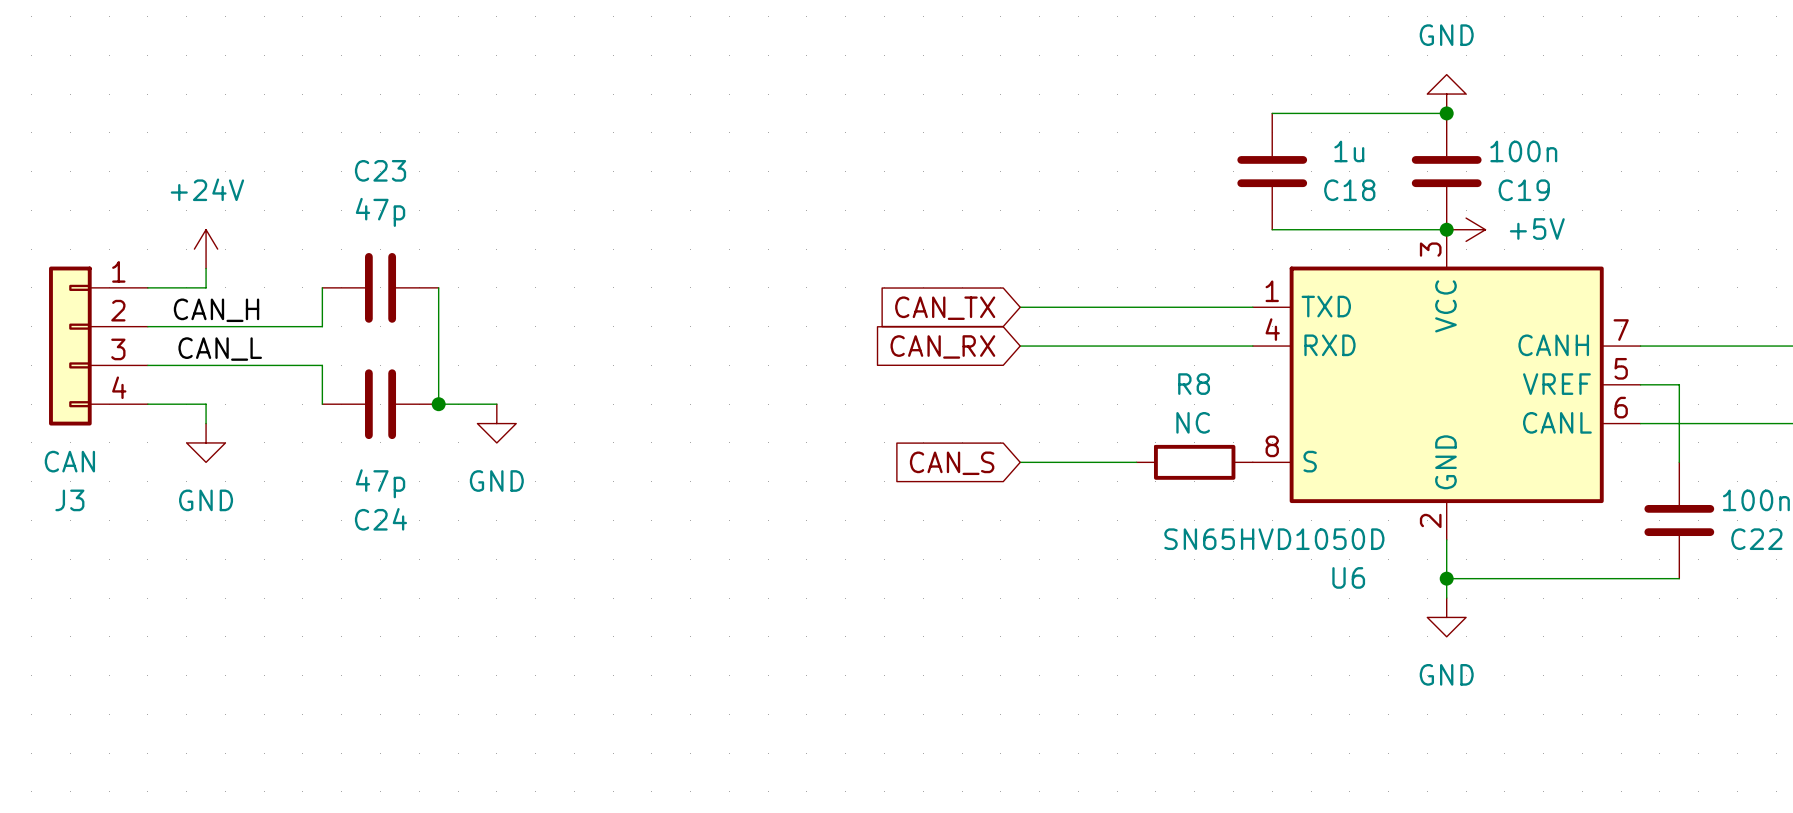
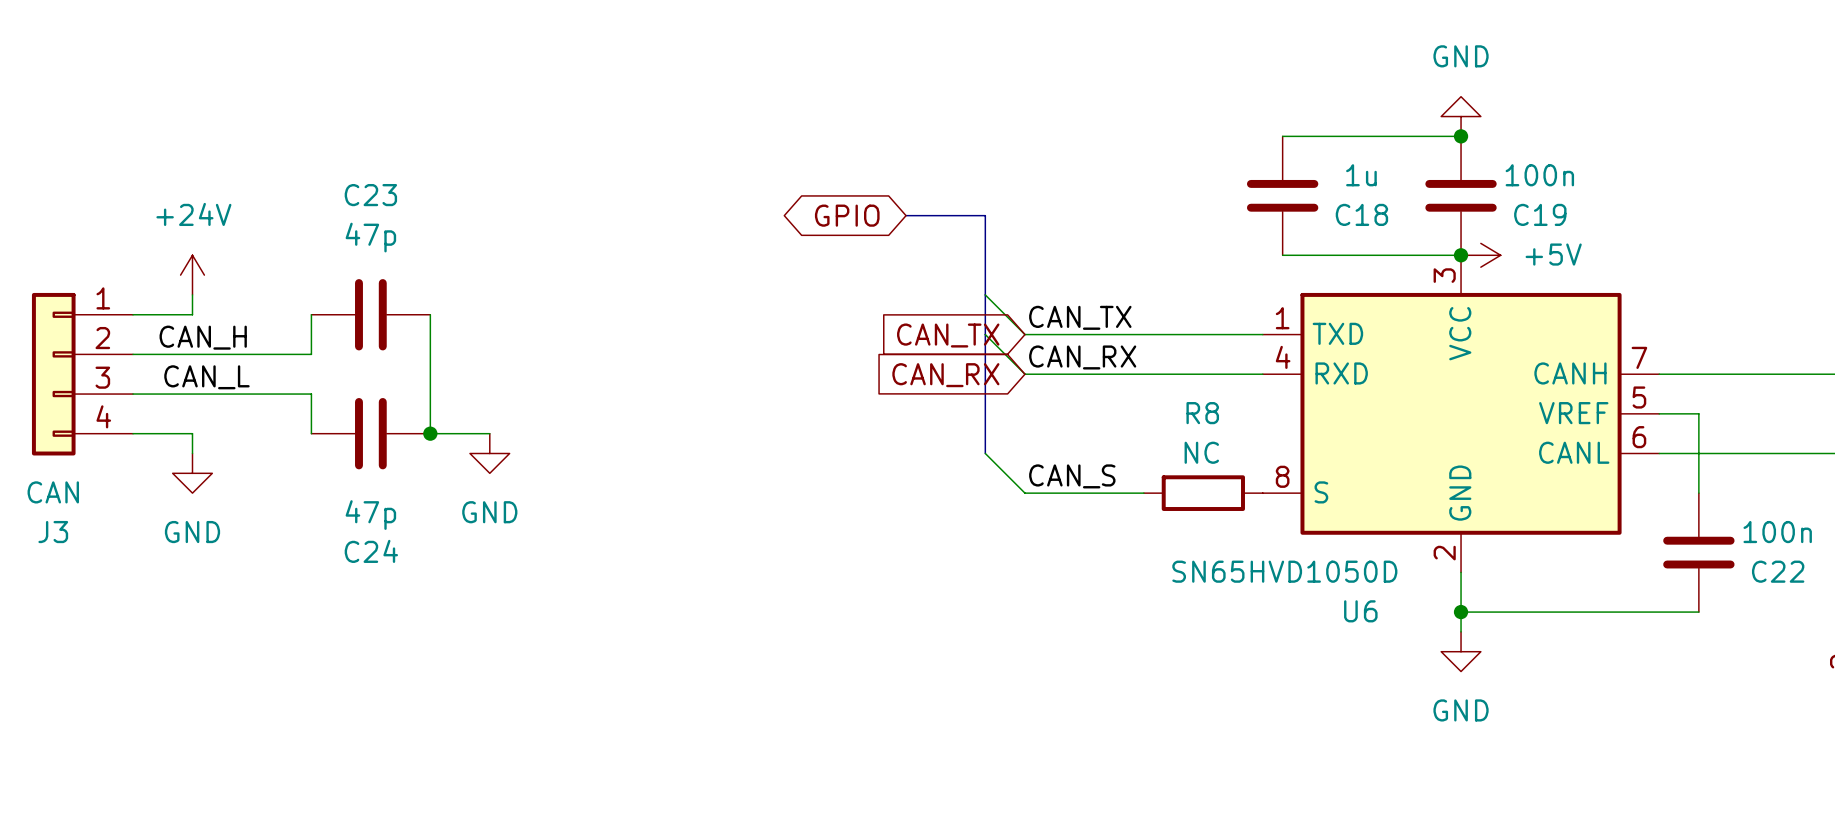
global label: none -> GPIO (847, 215)
bus: none -> (906, 215) (985, 215) (985, 453)
wire: none -> (985, 294) (1024, 334)
label: none -> CAN_TX (1080, 317)
wire: none -> (985, 334) (1024, 374)
label: none -> CAN_RX (1082, 357)
wire: none -> (985, 453) (1024, 493)
label: none -> CAN_S (1072, 476)
global label: CAN_S (952, 463) -> none

